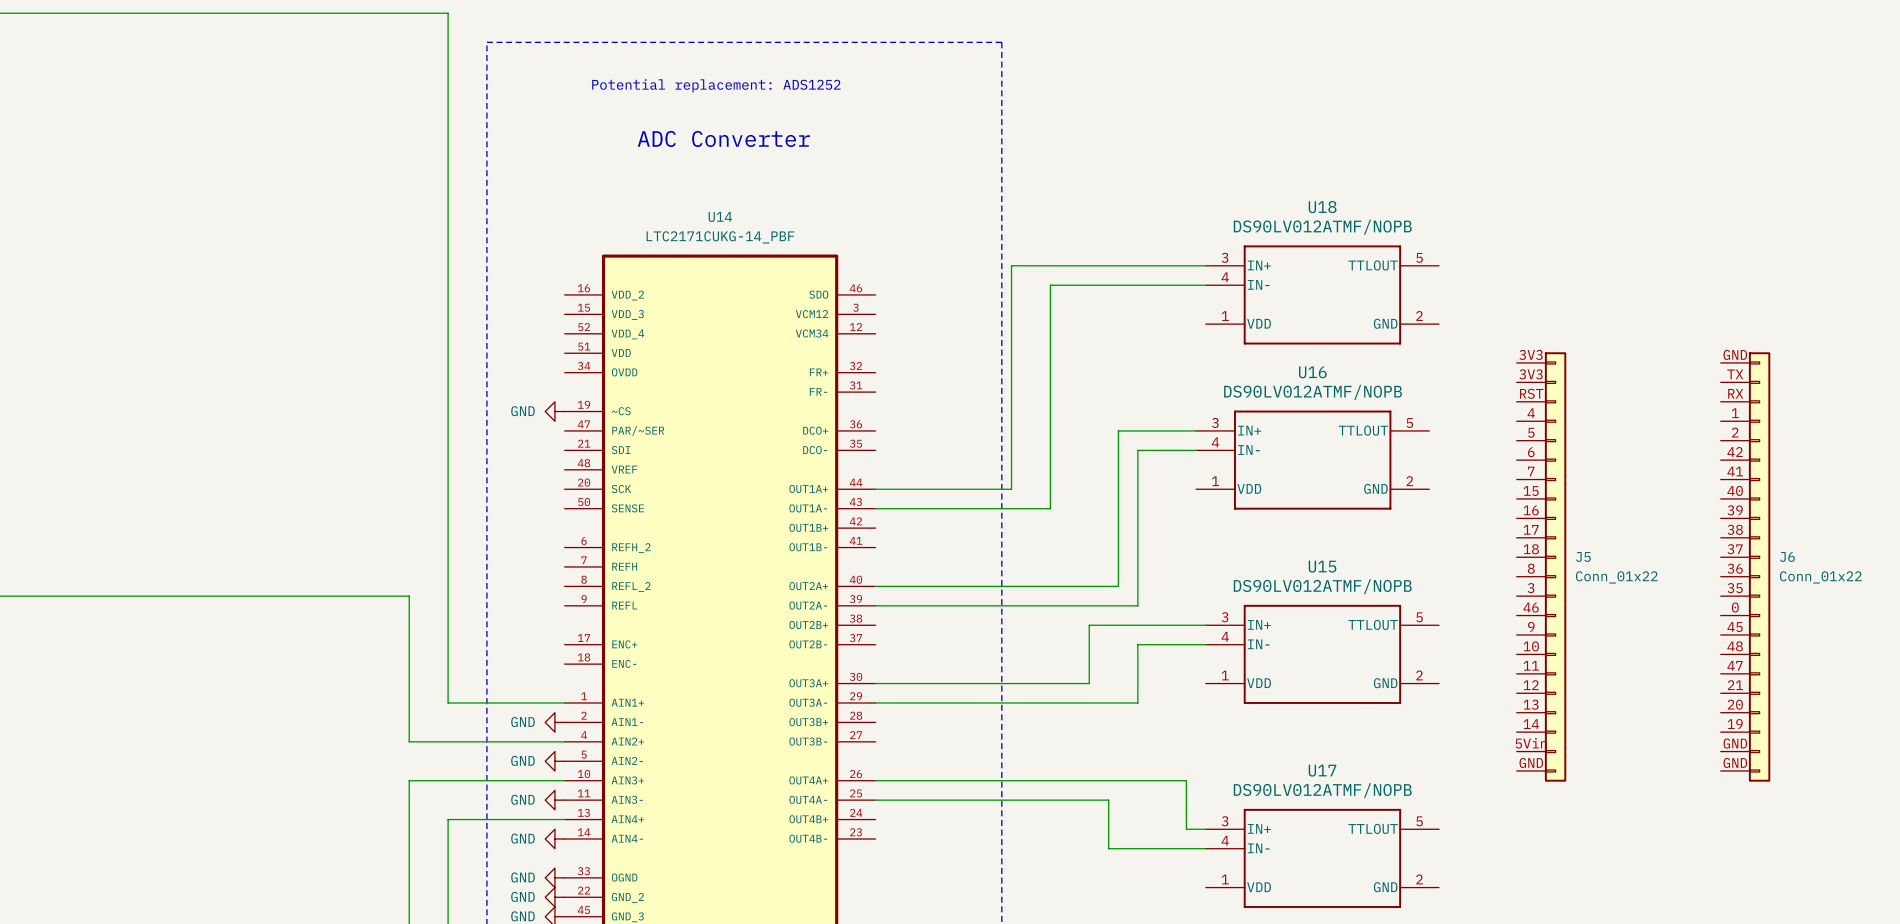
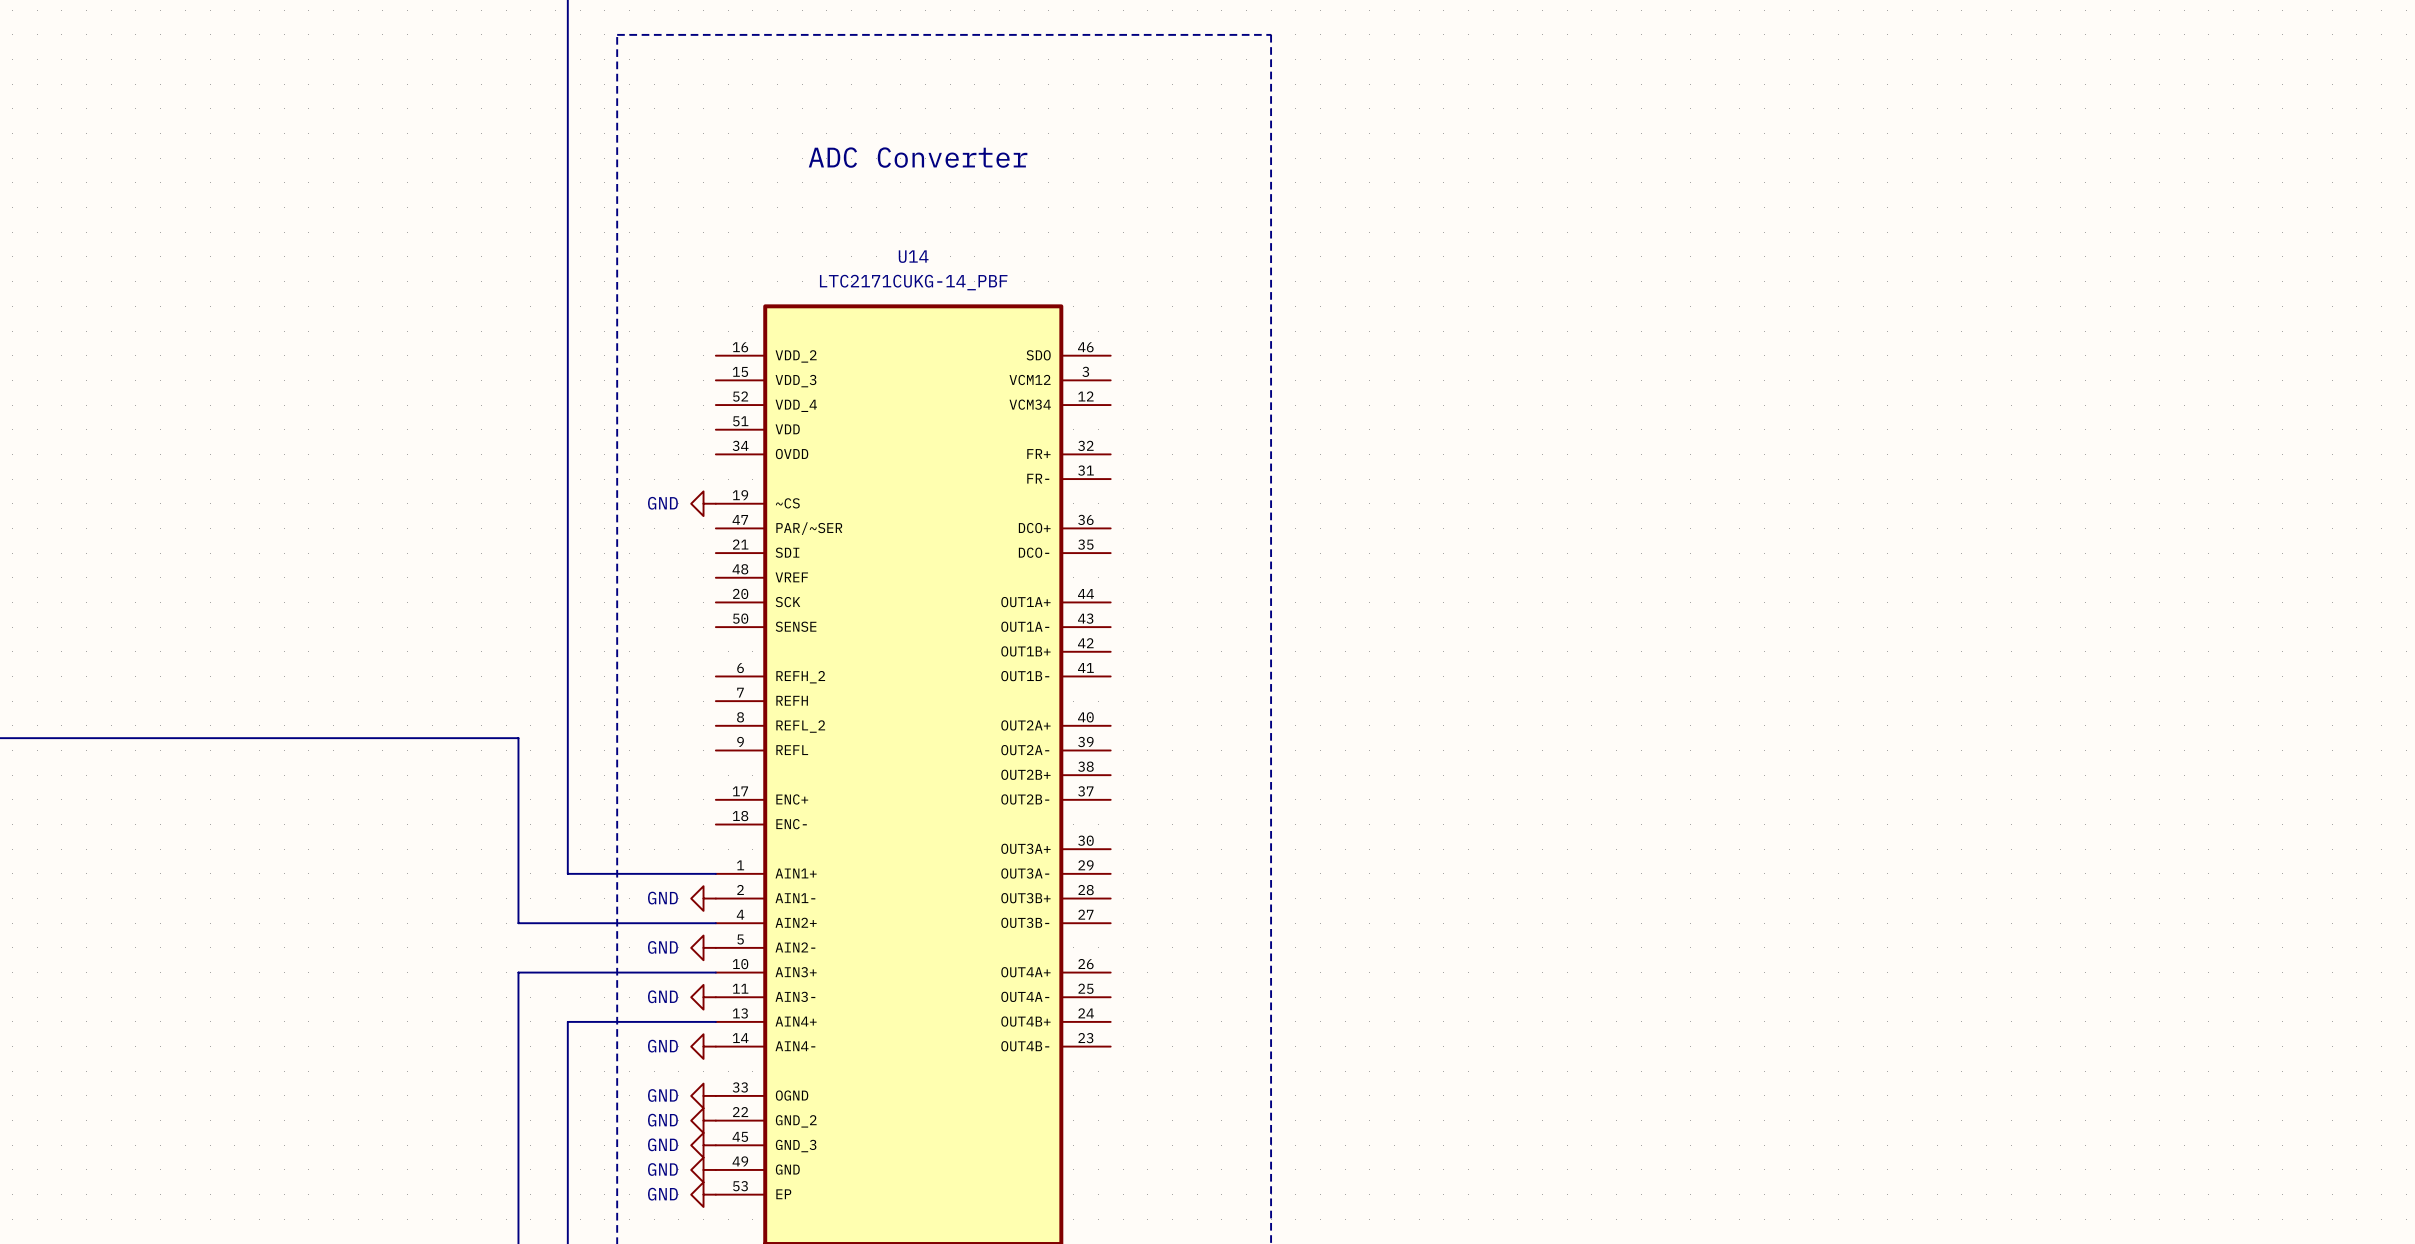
text: Potential replacement: ADS1252 (716, 85) -> none
wire: (1205, 265) (1011, 265) (1011, 489) (875, 489) -> none
wire: (1205, 285) (1050, 285) (1050, 508) (875, 508) -> none
U18: DS90LV012ATMF/NOPB (1322, 294) -> none
wire: (1196, 430) (1118, 430) (1118, 586) (875, 586) -> none
wire: (1196, 450) (1137, 450) (1137, 605) (875, 605) -> none
U16: DS90LV012ATMF/NOPB (1312, 460) -> none
J5: Conn_01x22 (1541, 566) -> none
J6: Conn_01x22 (1745, 566) -> none
wire: (1205, 625) (1089, 625) (1089, 683) (875, 683) -> none
wire: (1205, 644) (1137, 644) (1137, 702) (875, 702) -> none
U15: DS90LV012ATMF/NOPB (1322, 654) -> none
wire: (875, 780) (1186, 780) (1186, 829) (1205, 829) -> none
wire: (875, 800) (1108, 800) (1108, 848) (1205, 848) -> none
U17: DS90LV012ATMF/NOPB (1322, 858) -> none

